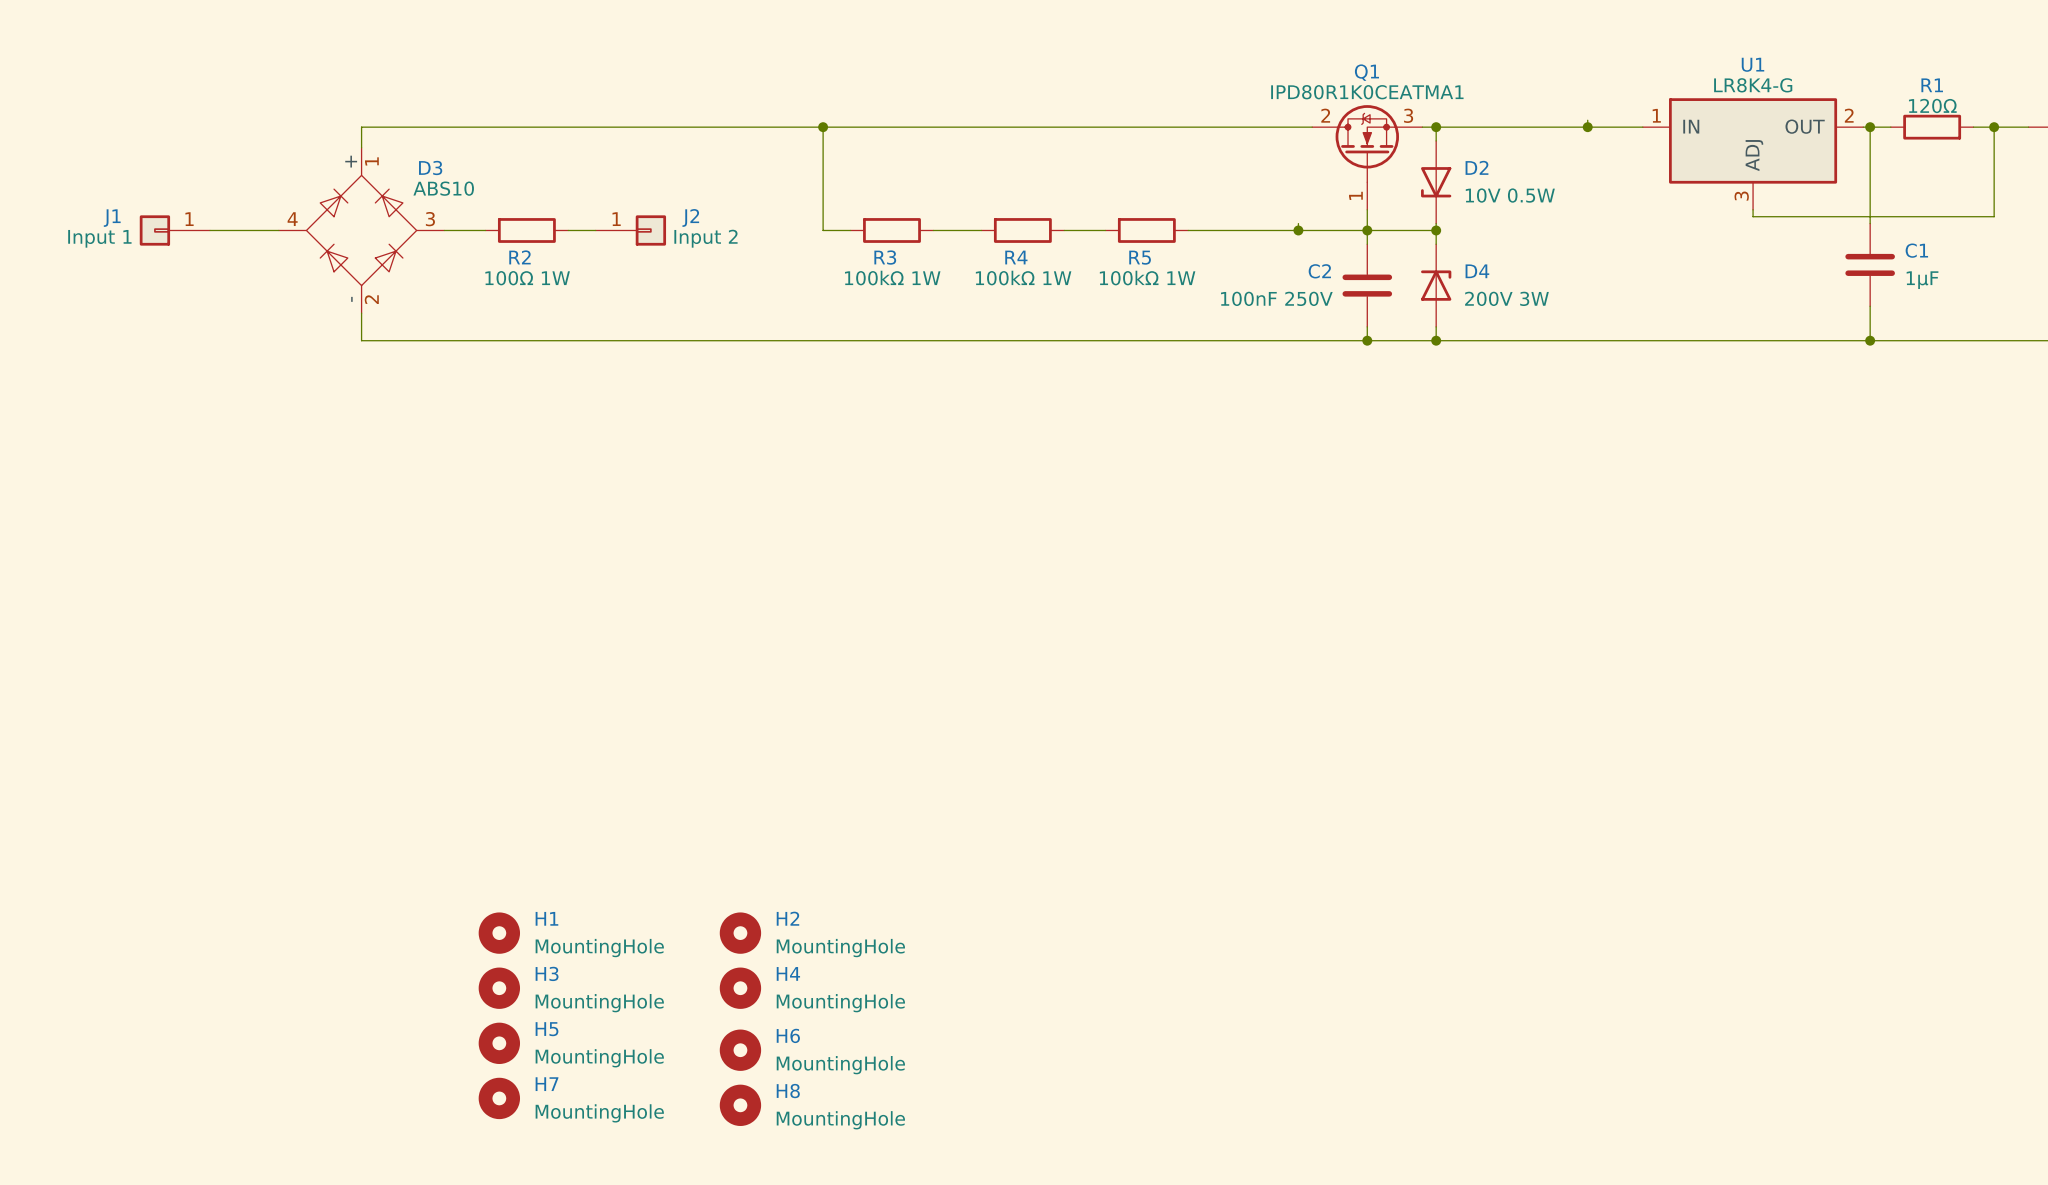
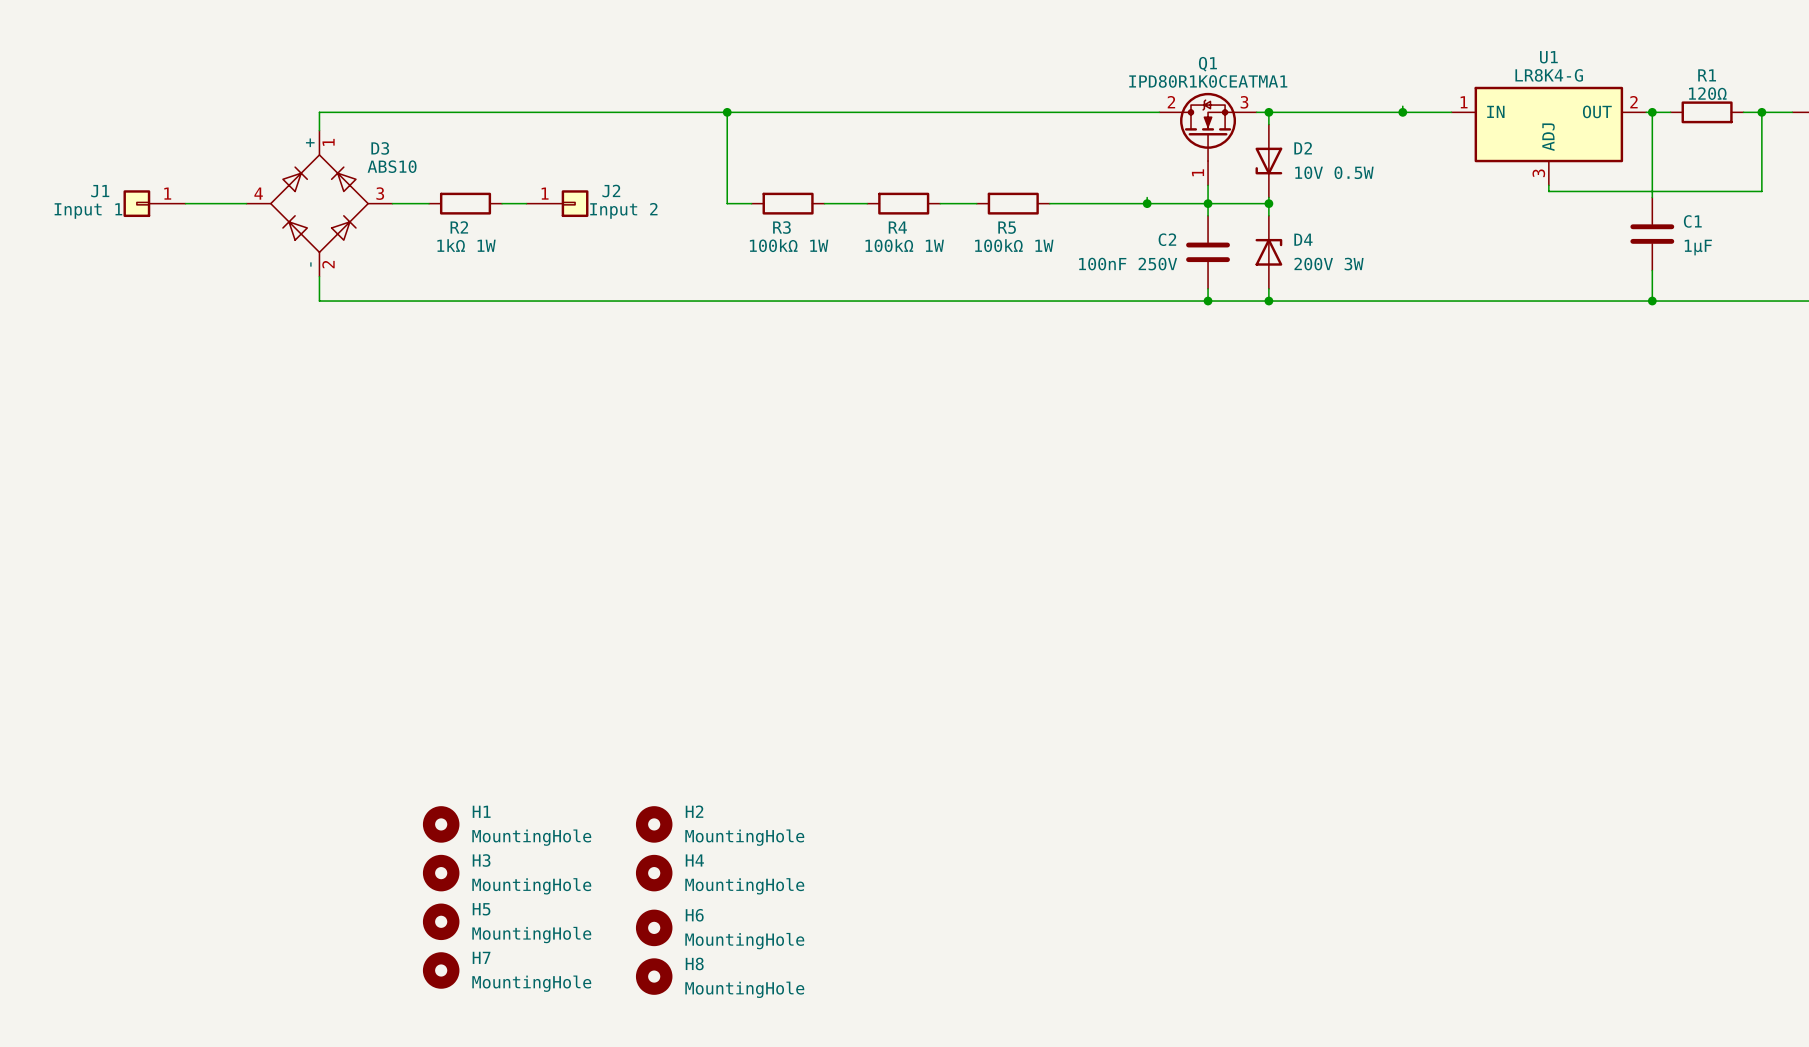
R2 value: 100Ω 1W (527, 278) -> 1kΩ 1W (466, 245)

